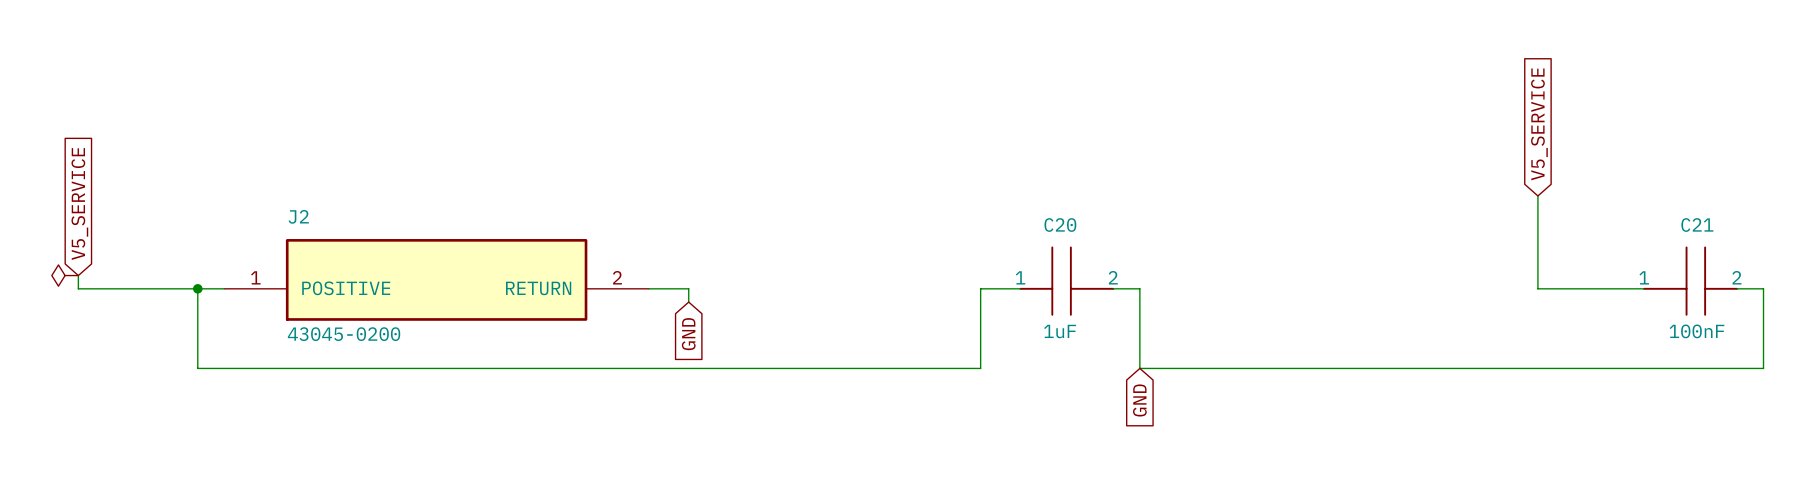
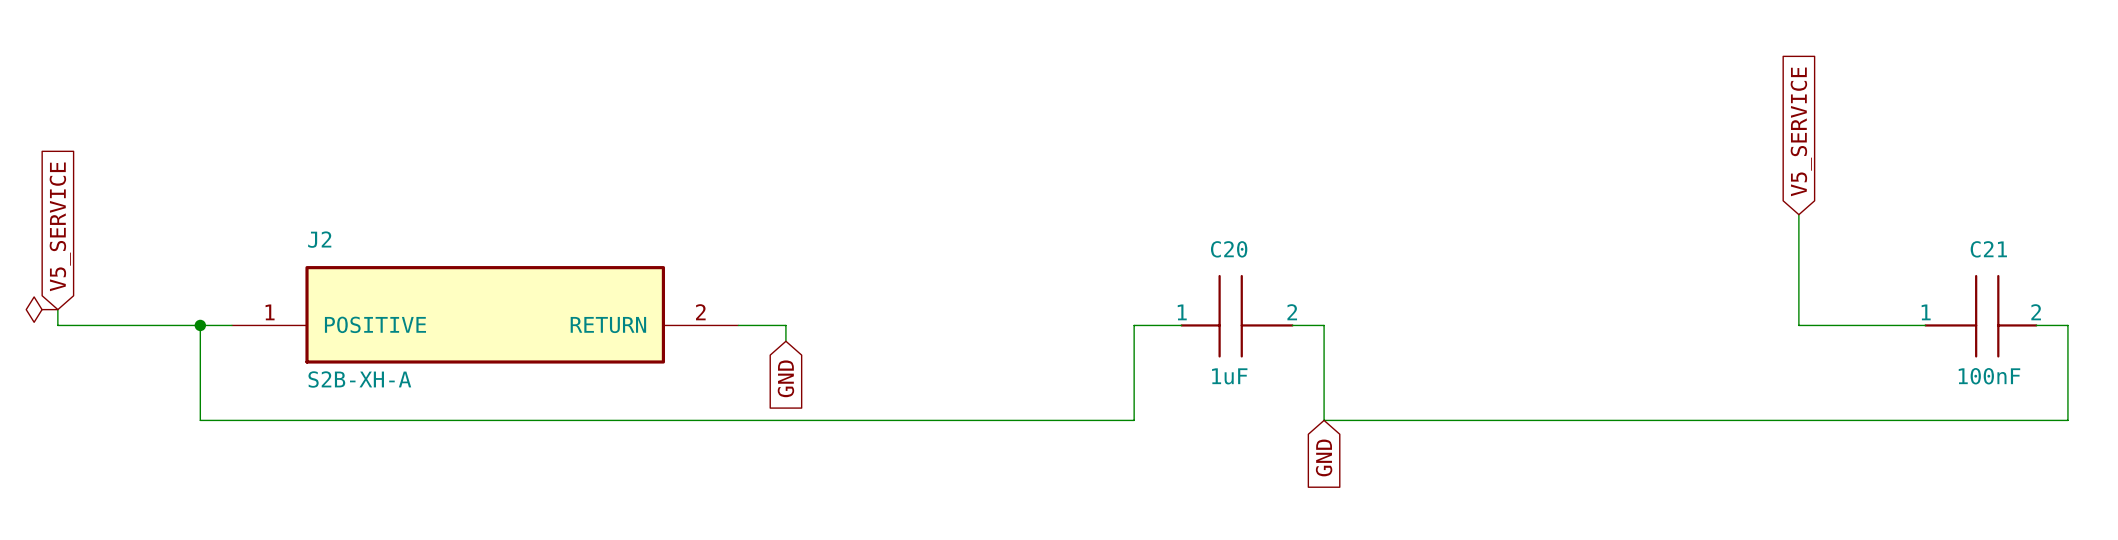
J2 value: 43045-0200 (344, 334) -> S2B-XH-A (359, 379)

